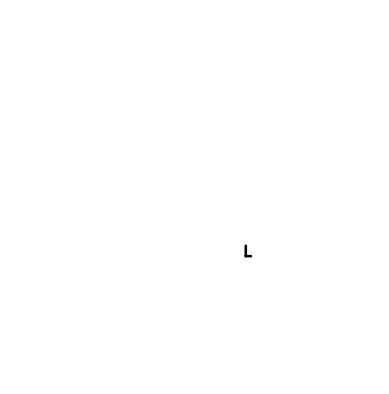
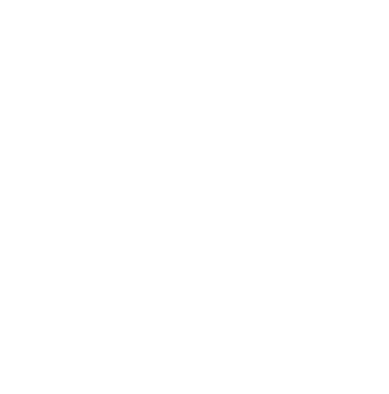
board edge: (245, 245) (245, 256) (250, 256) -> none

